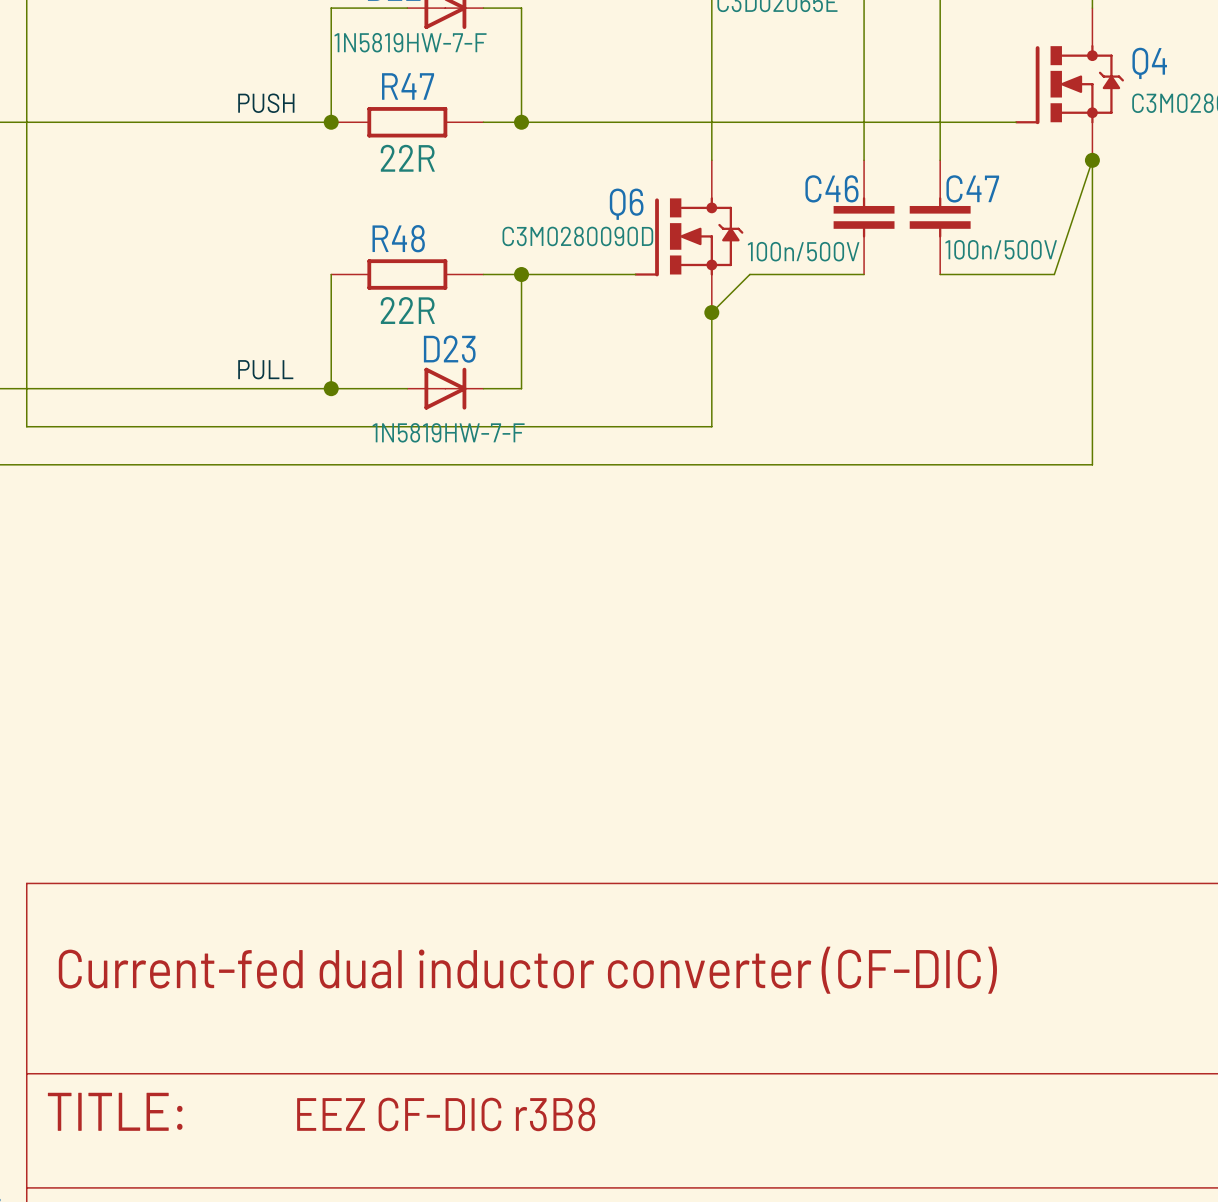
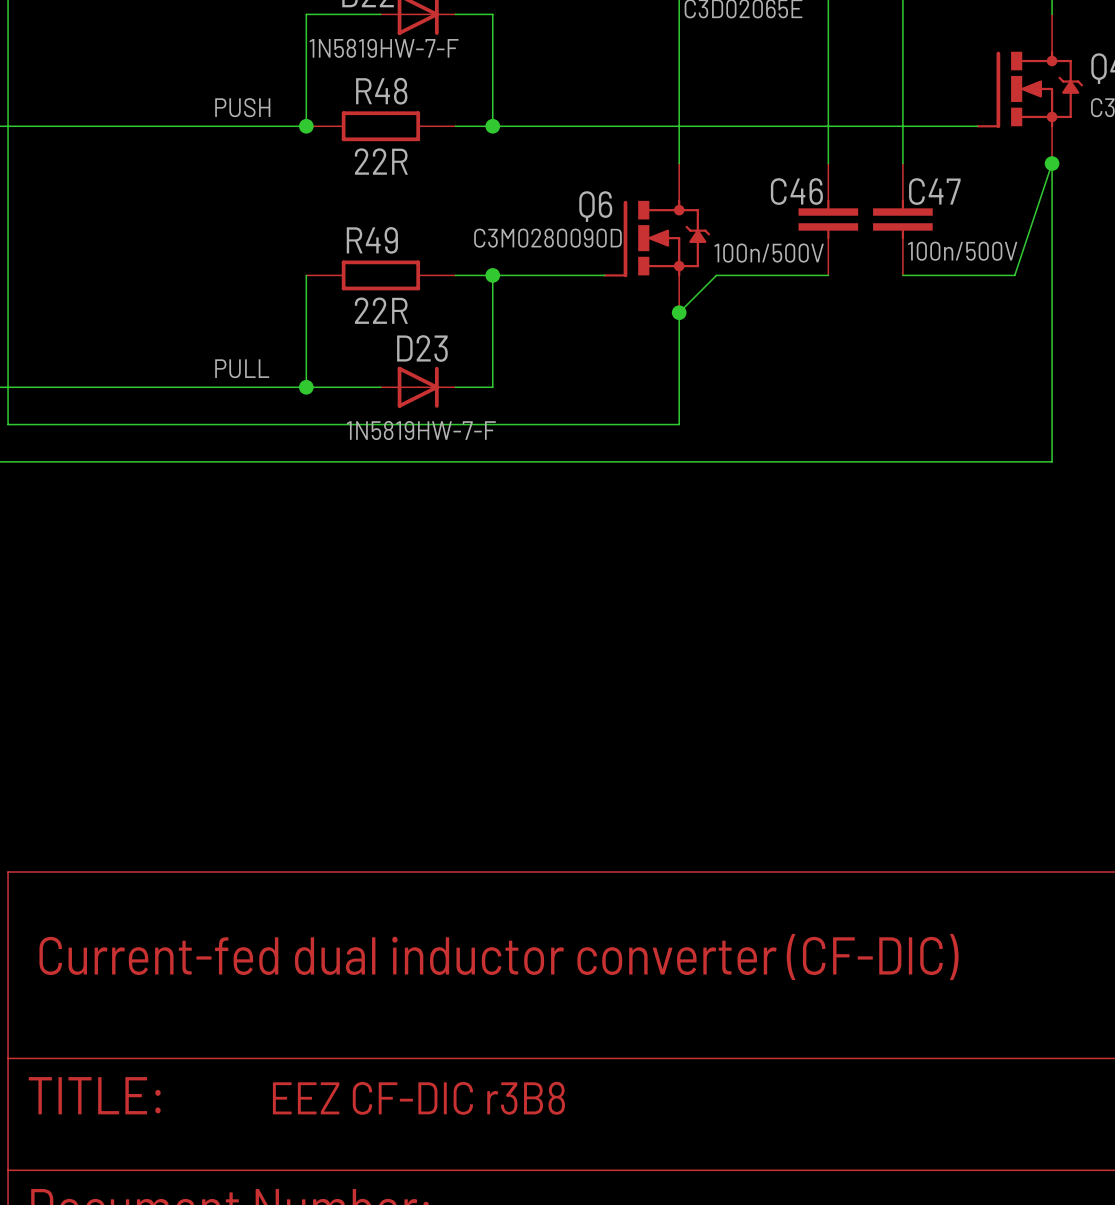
R47 name: R47 (408, 86) -> R48 (381, 91)
R48 name: R48 (398, 238) -> R49 (372, 240)

